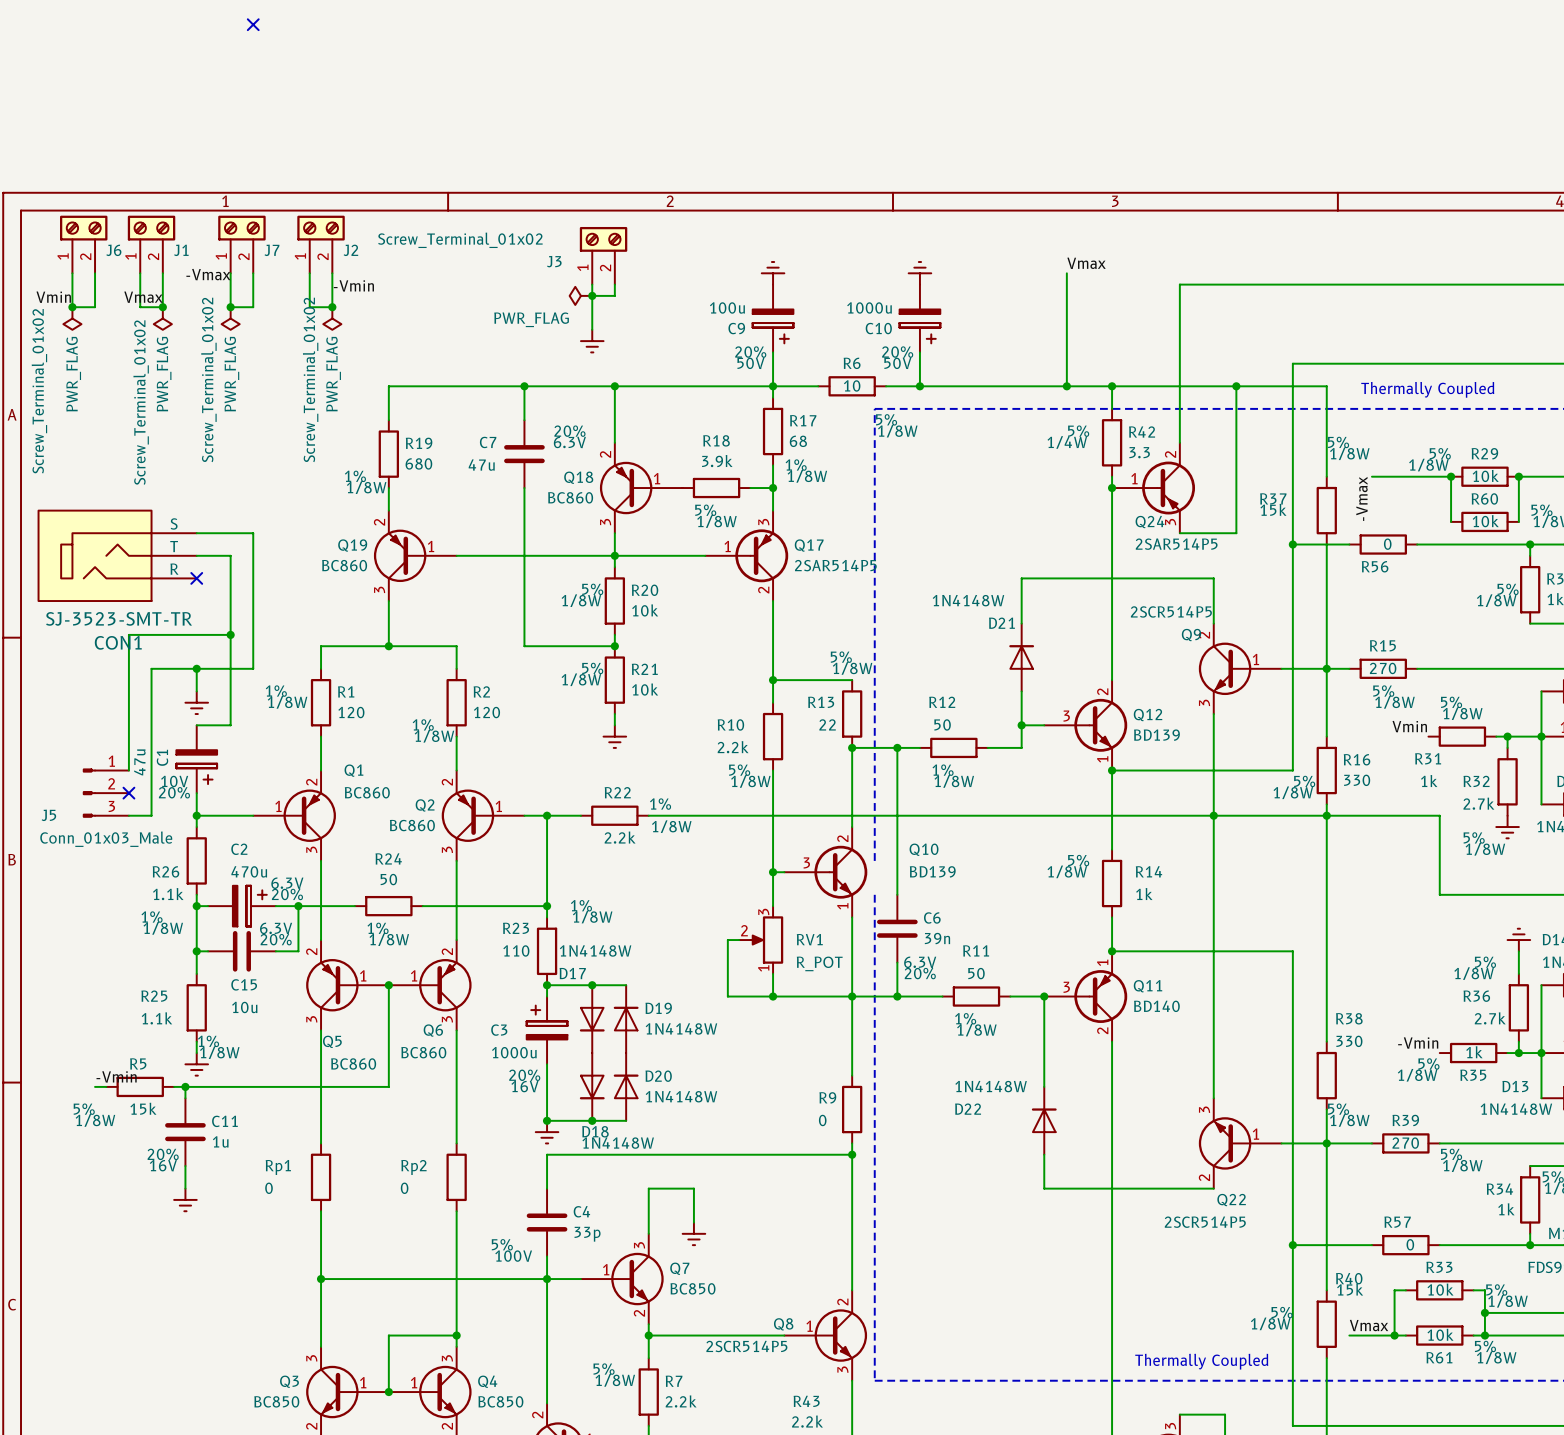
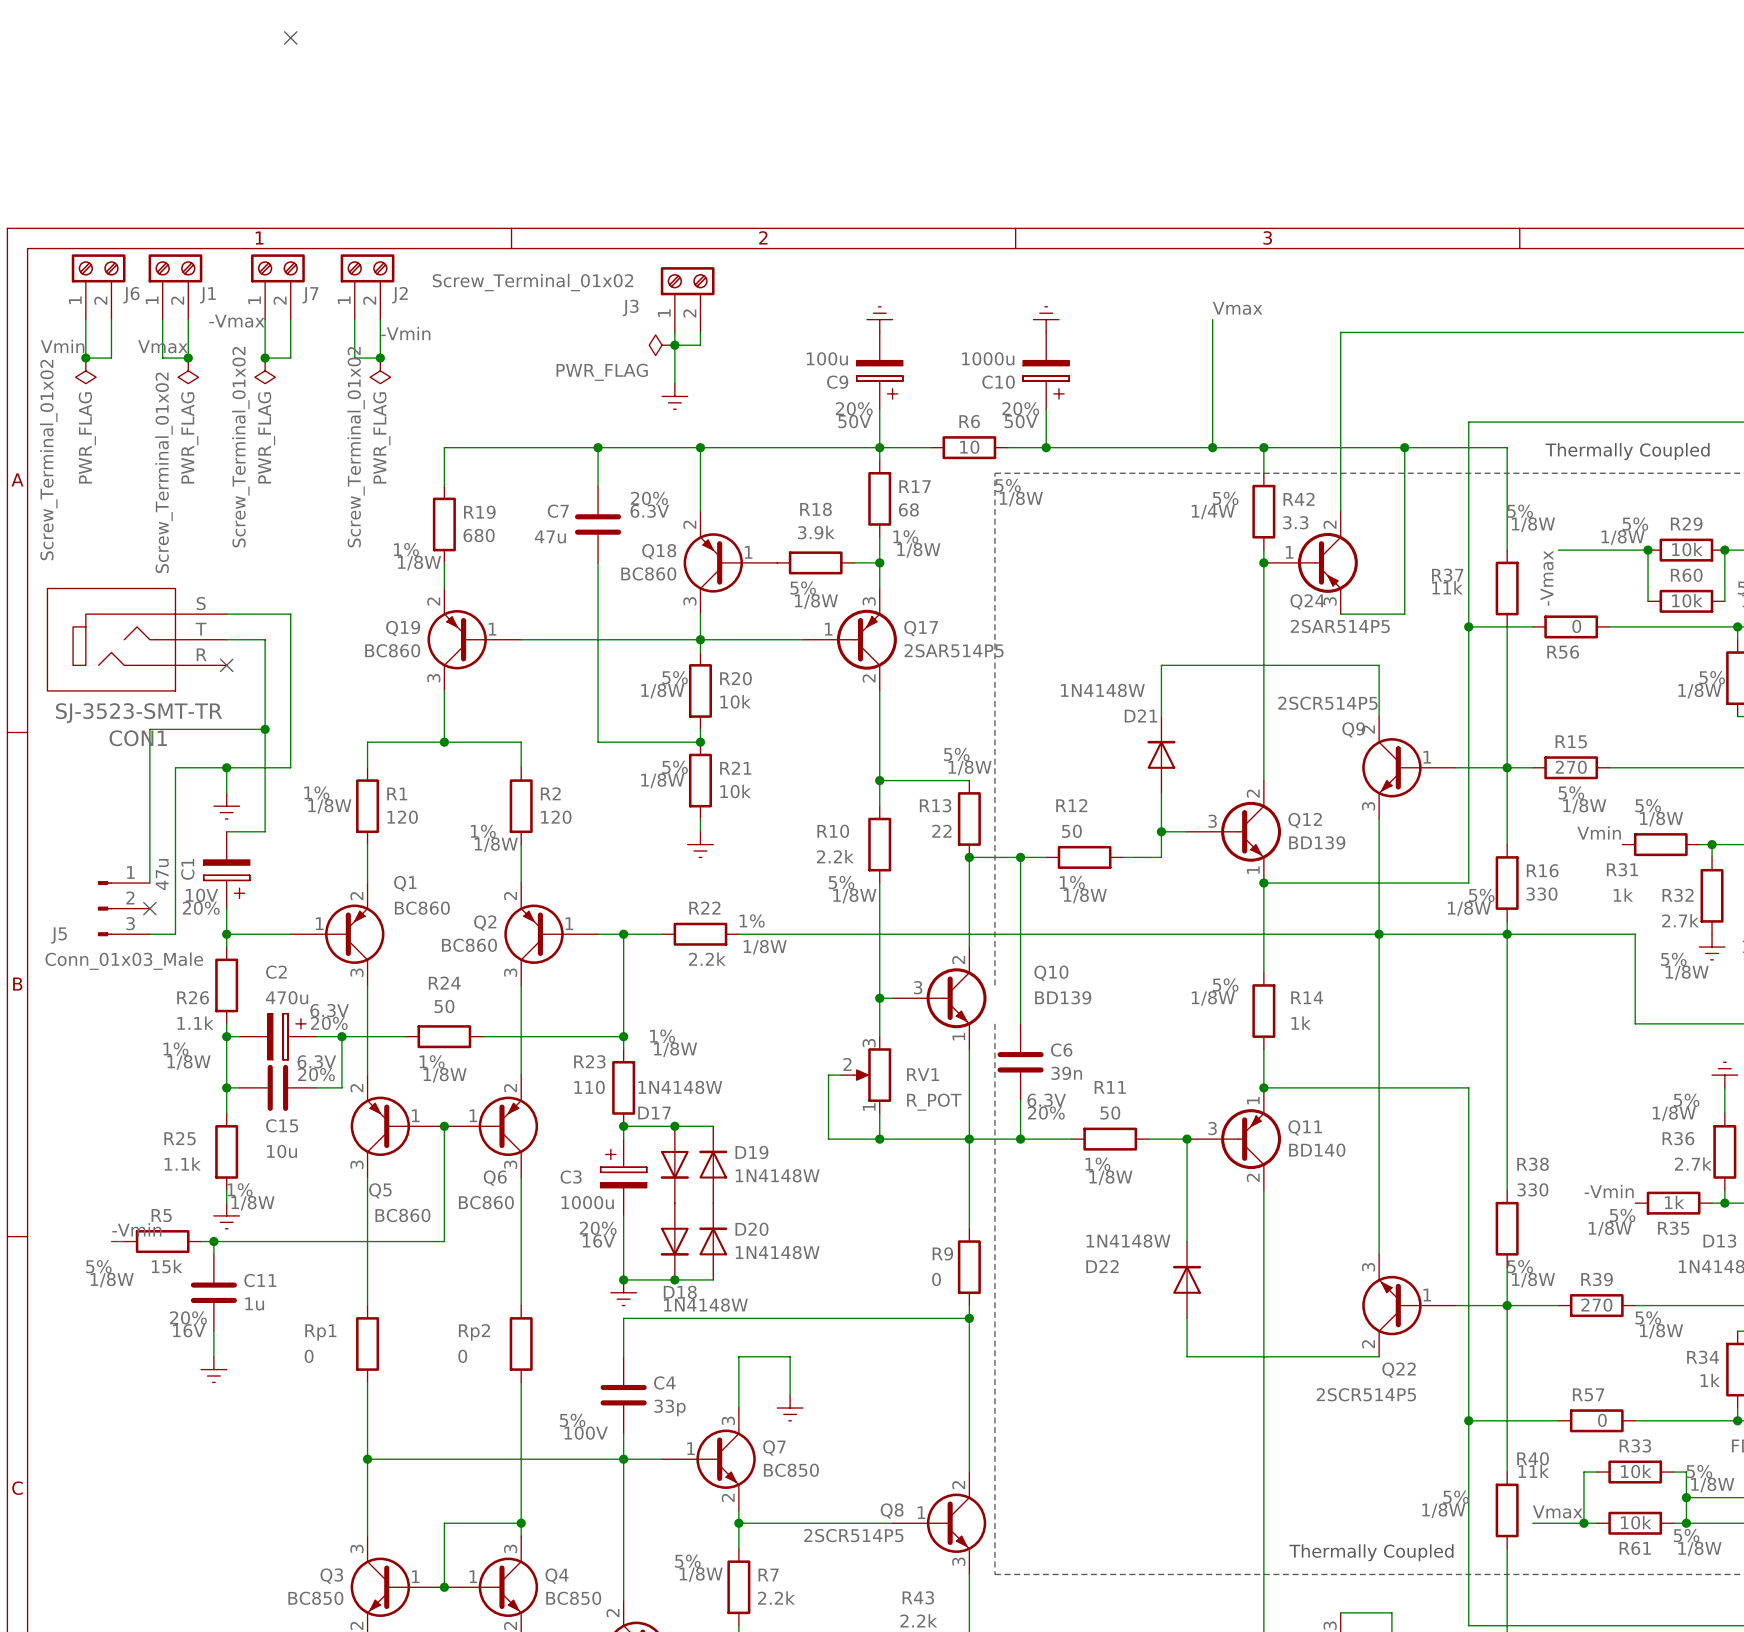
R37 value: 15k (1273, 509) -> 11k (1447, 587)
R40 value: 15k (1350, 1289) -> 11k (1533, 1471)

